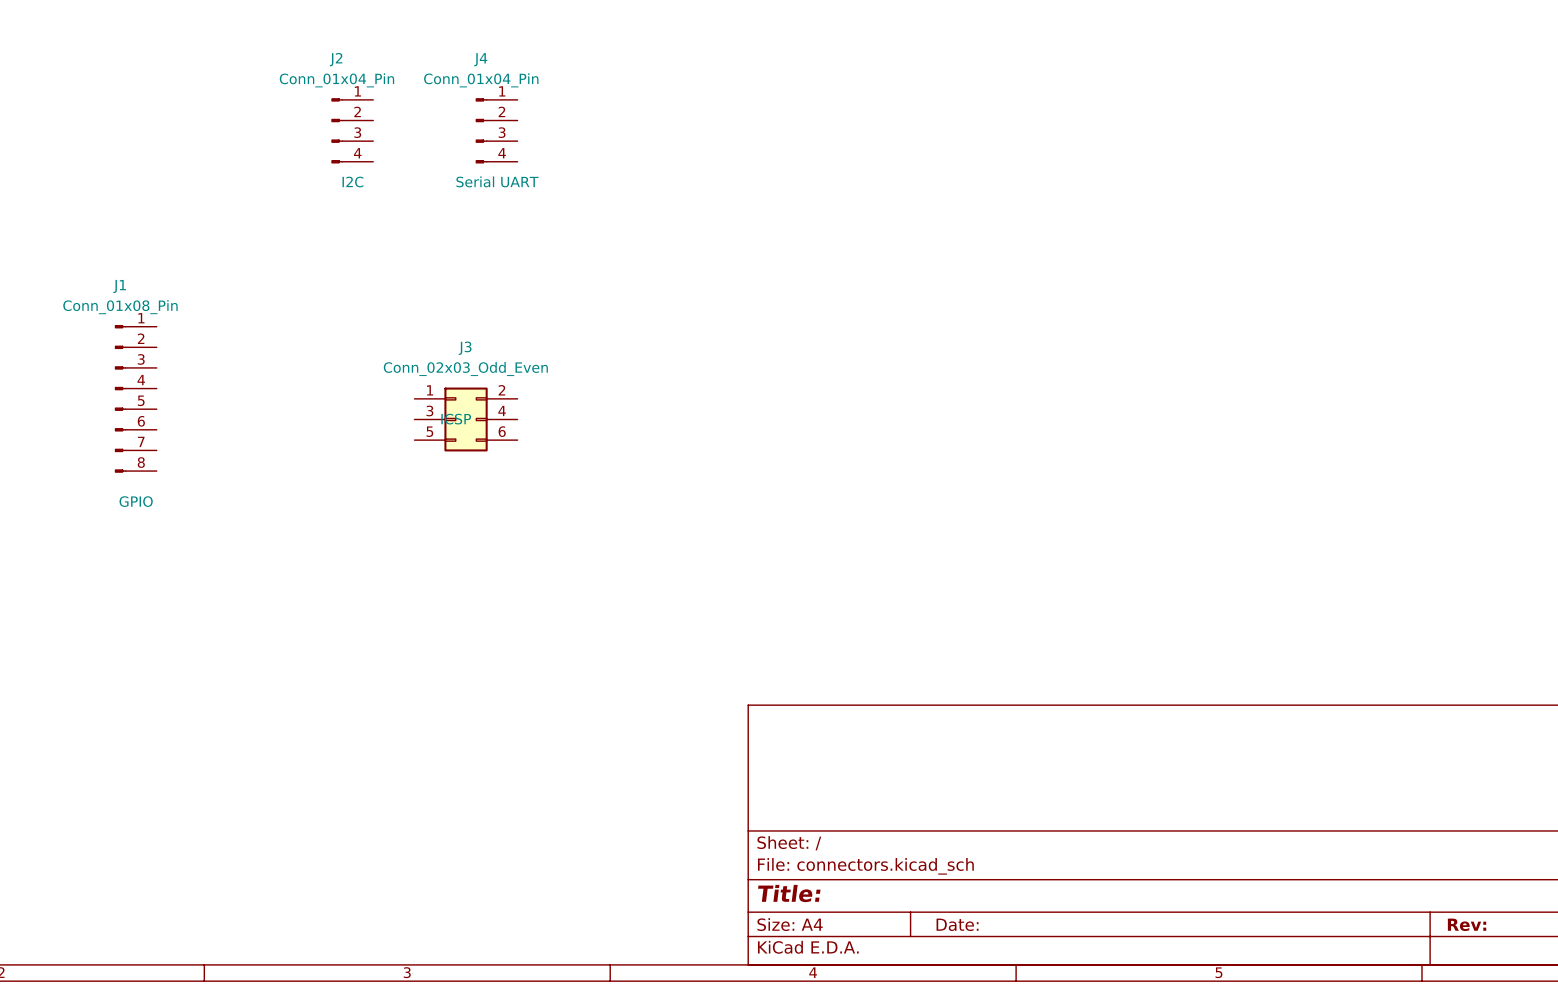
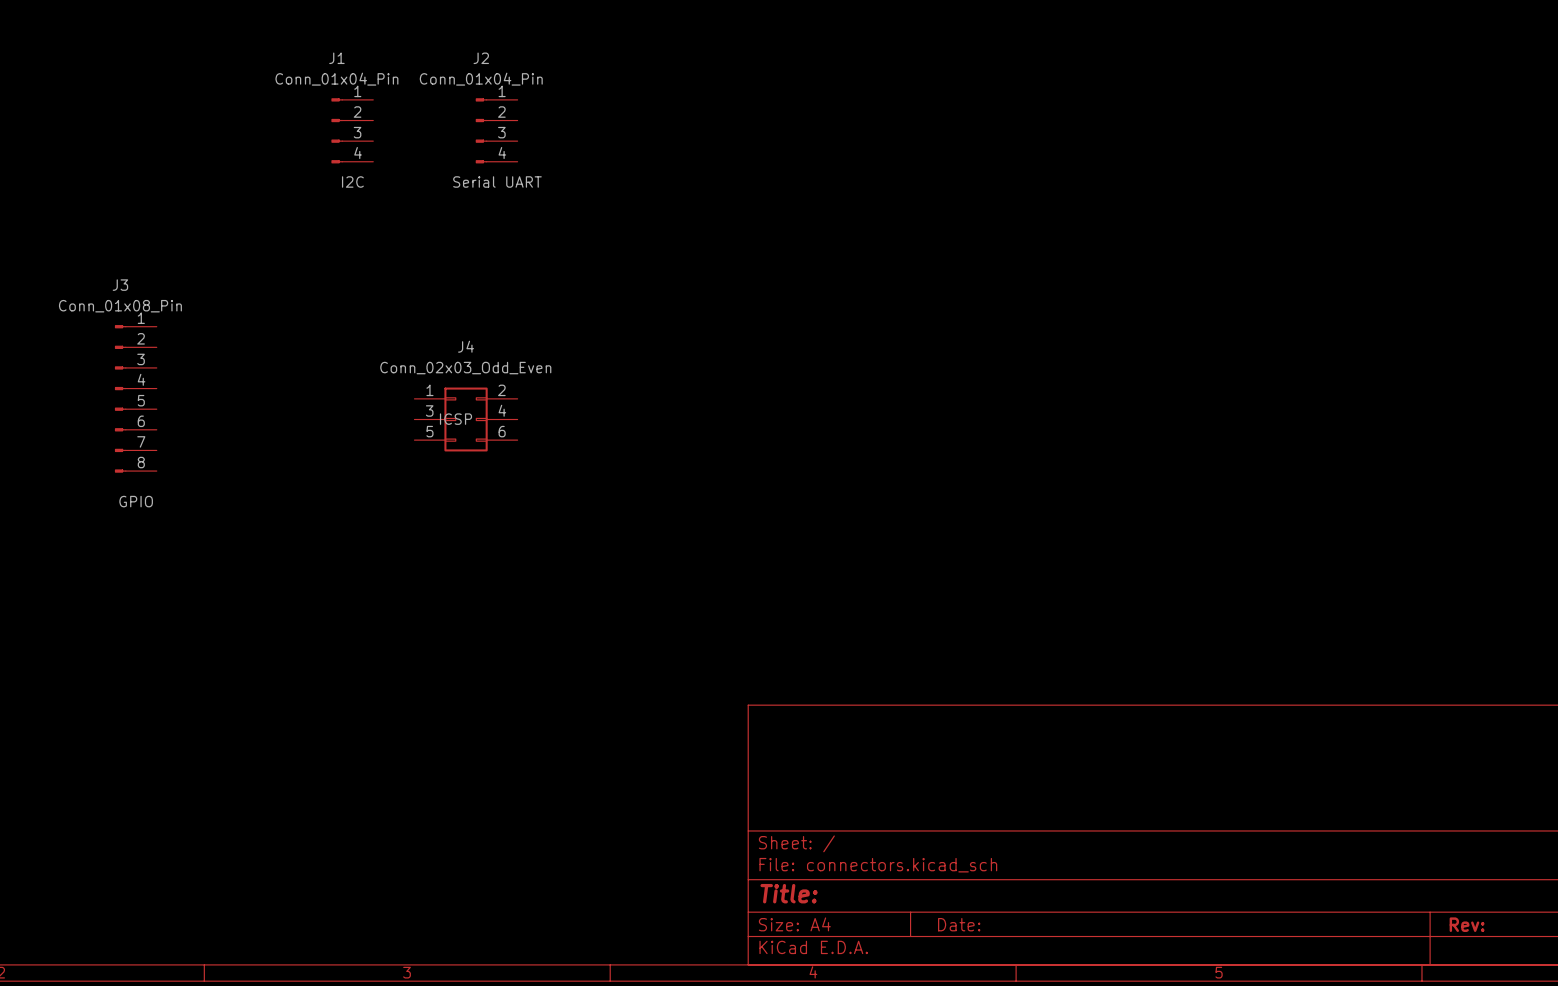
J2 name: J2 (336, 59) -> J1 (336, 58)
J4 name: J4 (480, 59) -> J2 (481, 58)
J1 name: J1 (119, 286) -> J3 (120, 285)
J3 name: J3 (465, 348) -> J4 (466, 346)

